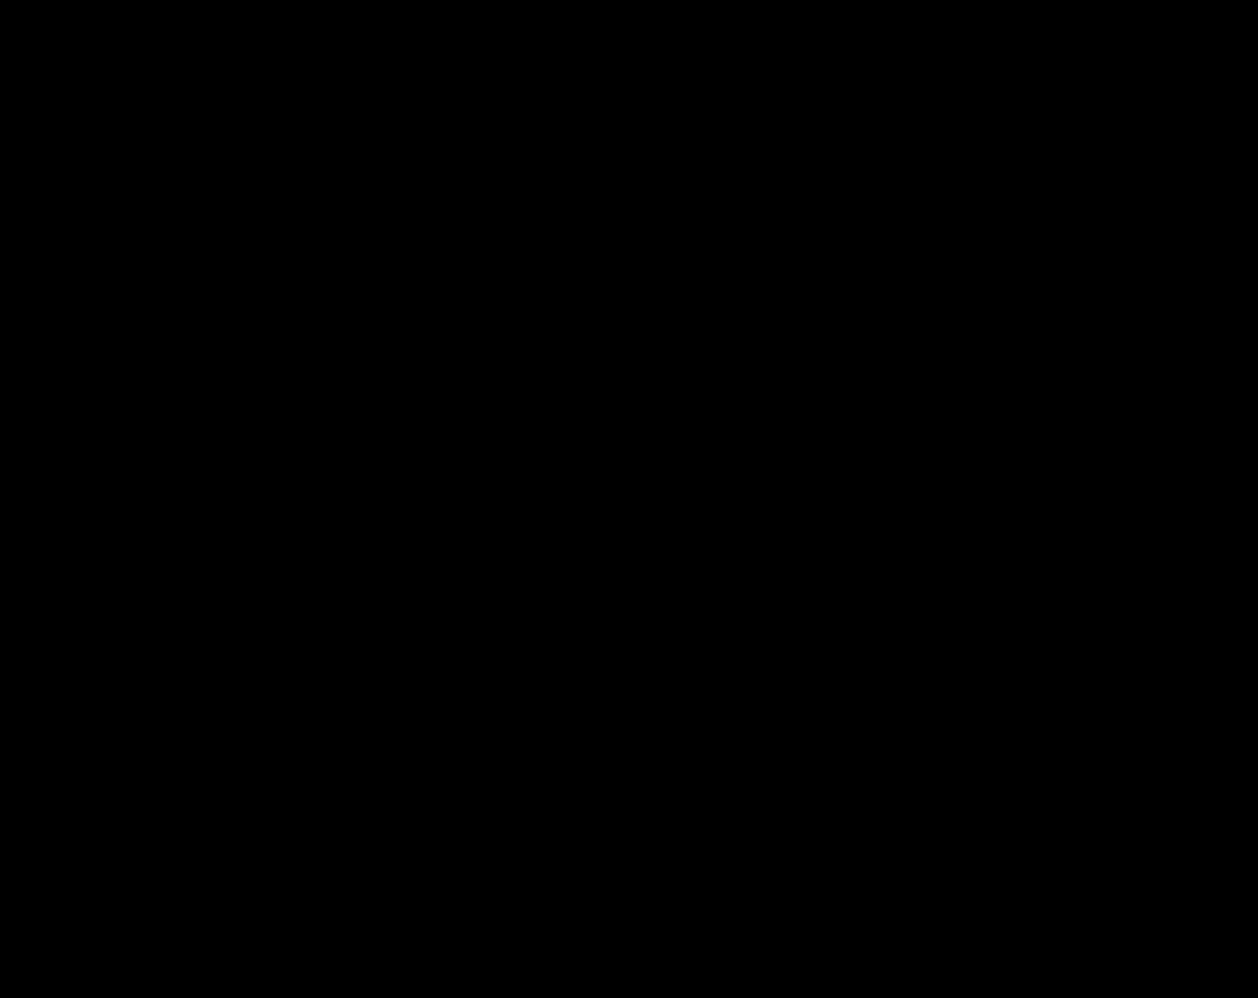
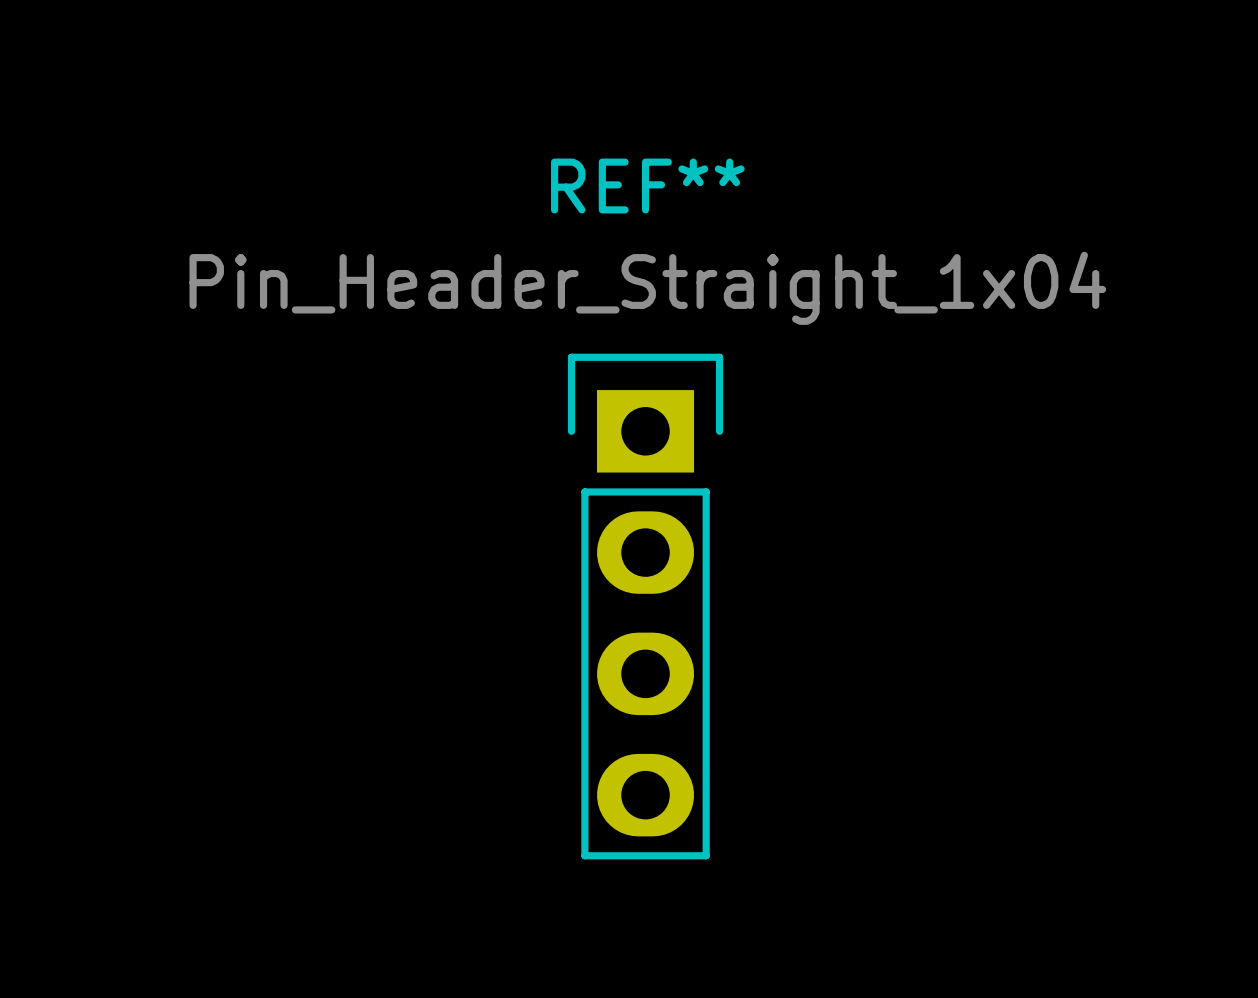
REF**: none -> Pin_Header_Straight_1x04 (645, 606)

